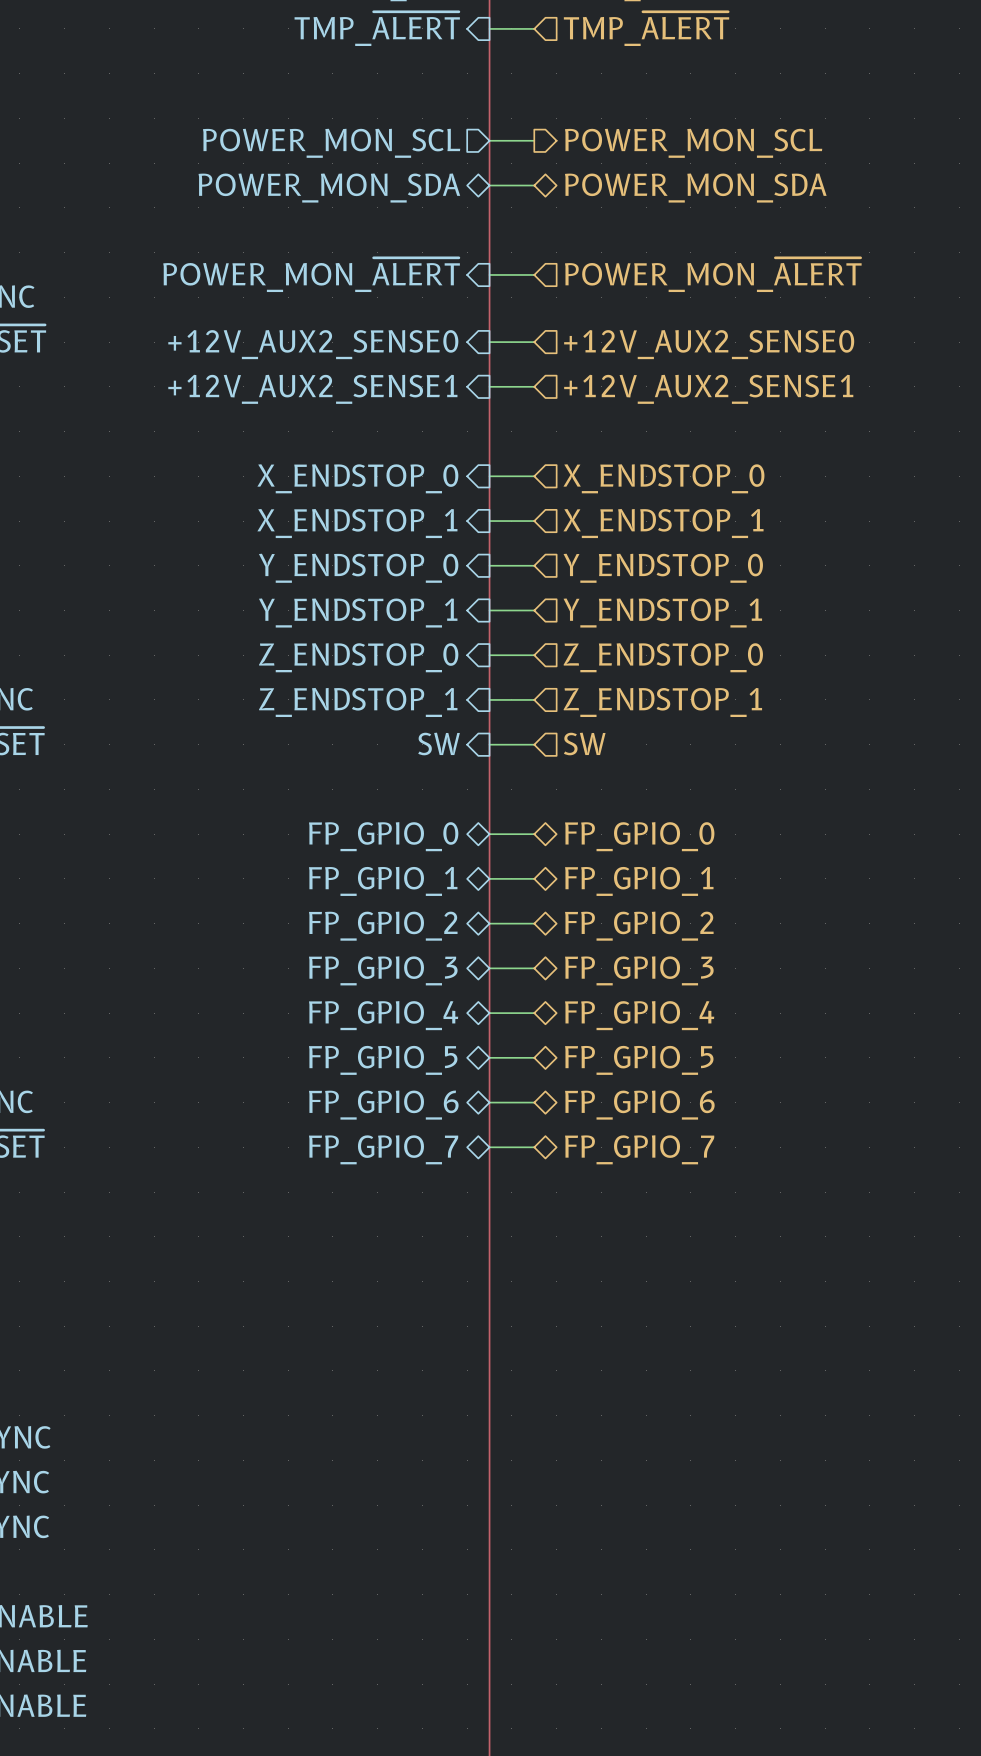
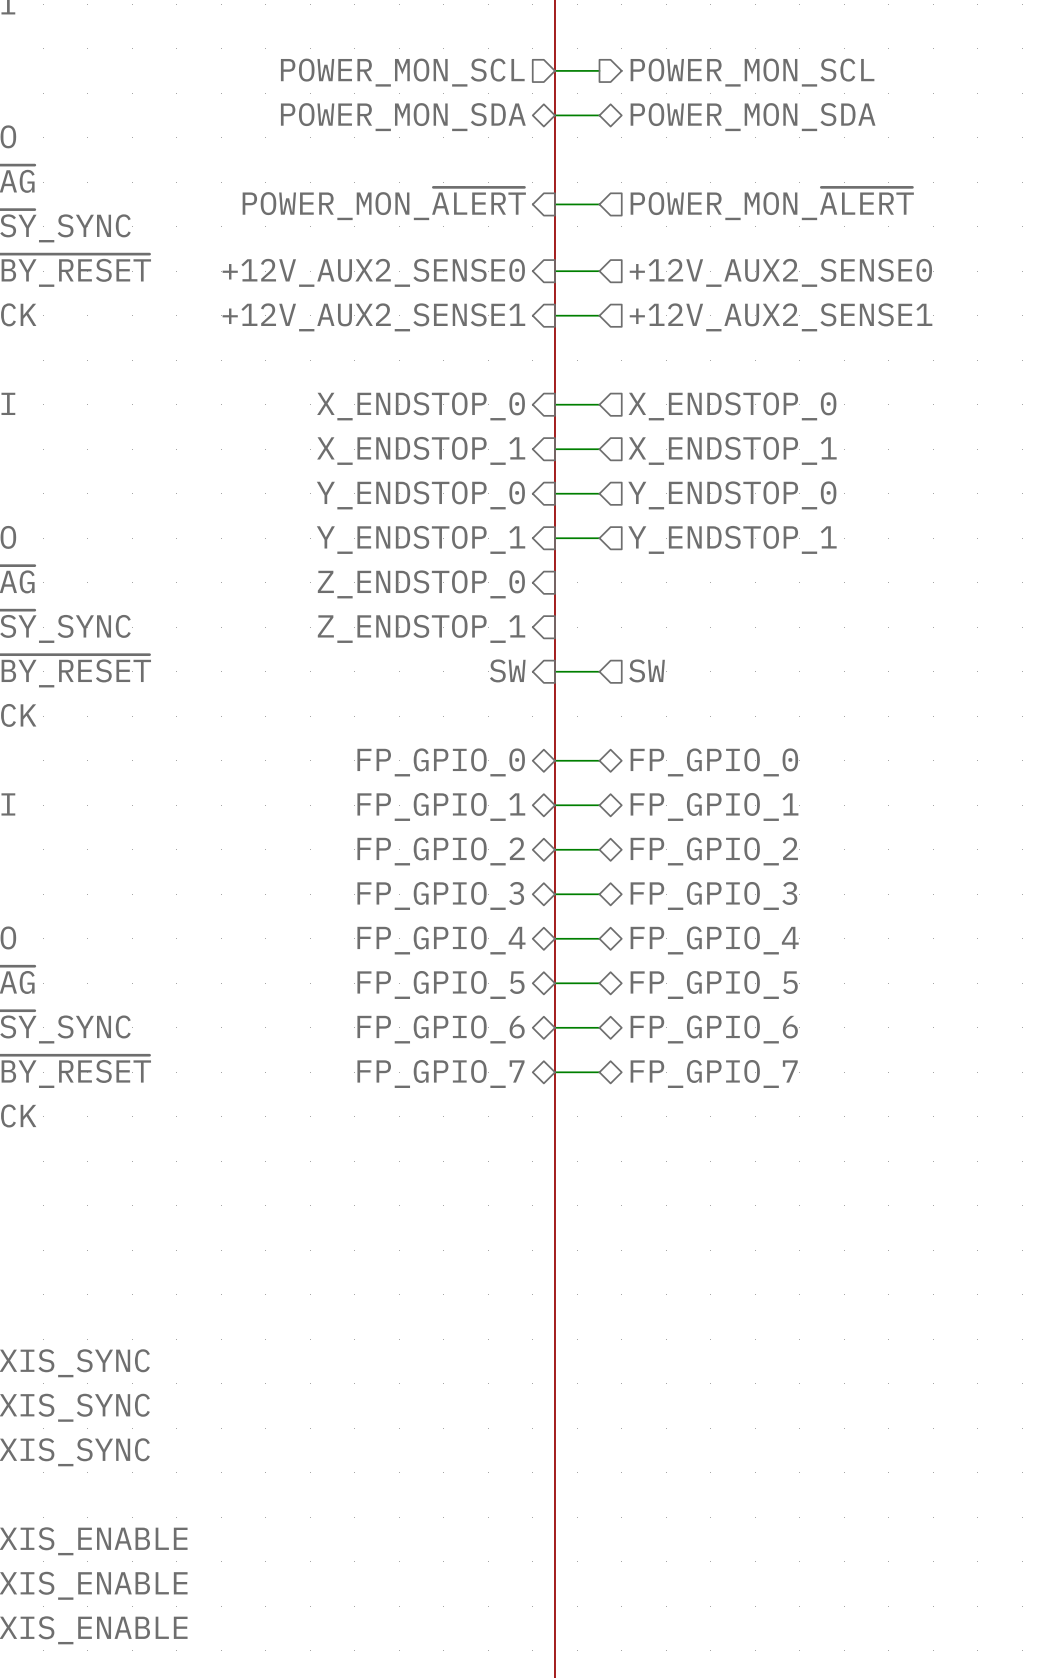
wire: (489, 655) (534, 655) -> none
hierarchical label: Z_ENDSTOP_0 (663, 657) -> none
wire: (489, 699) (534, 699) -> none
hierarchical label: Z_ENDSTOP_1 (662, 702) -> none

